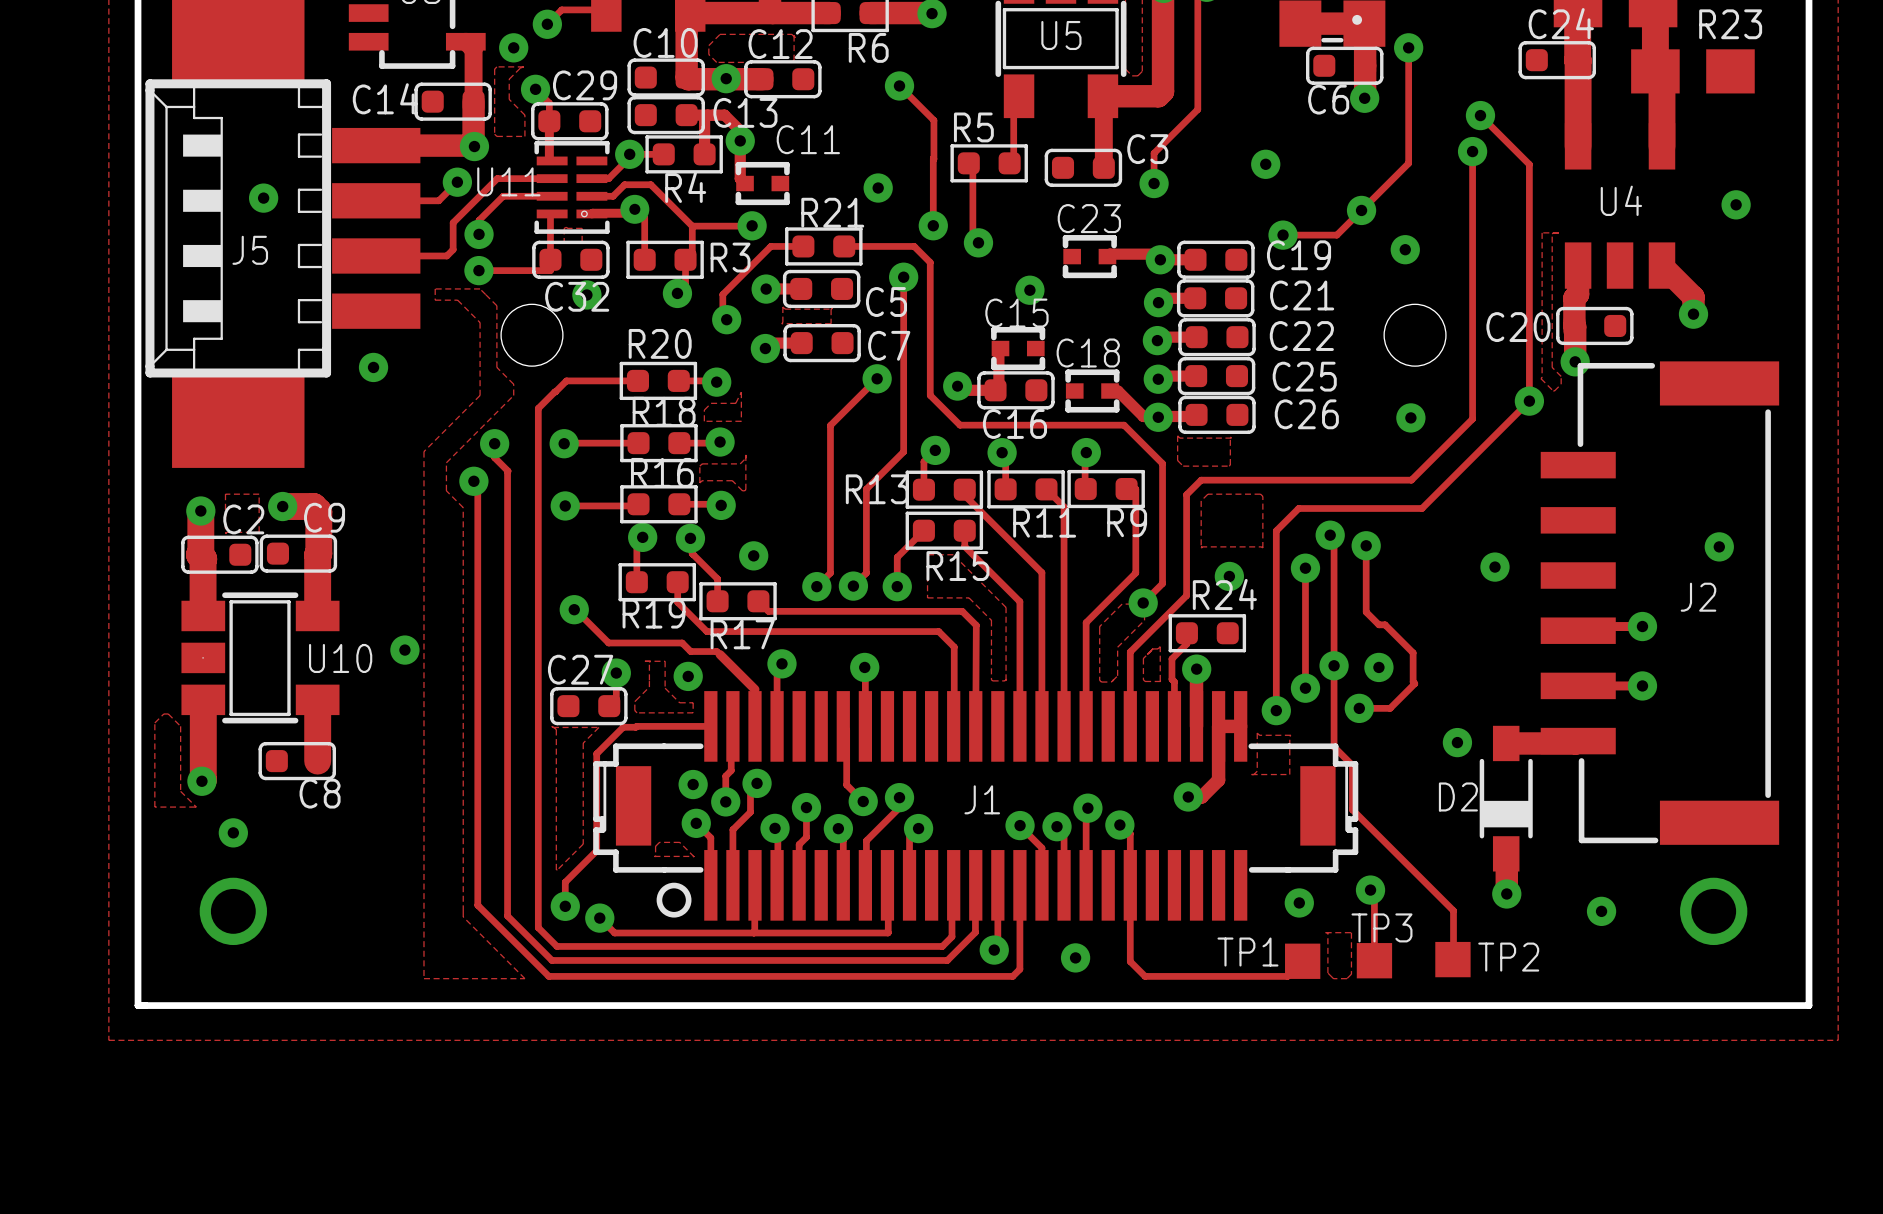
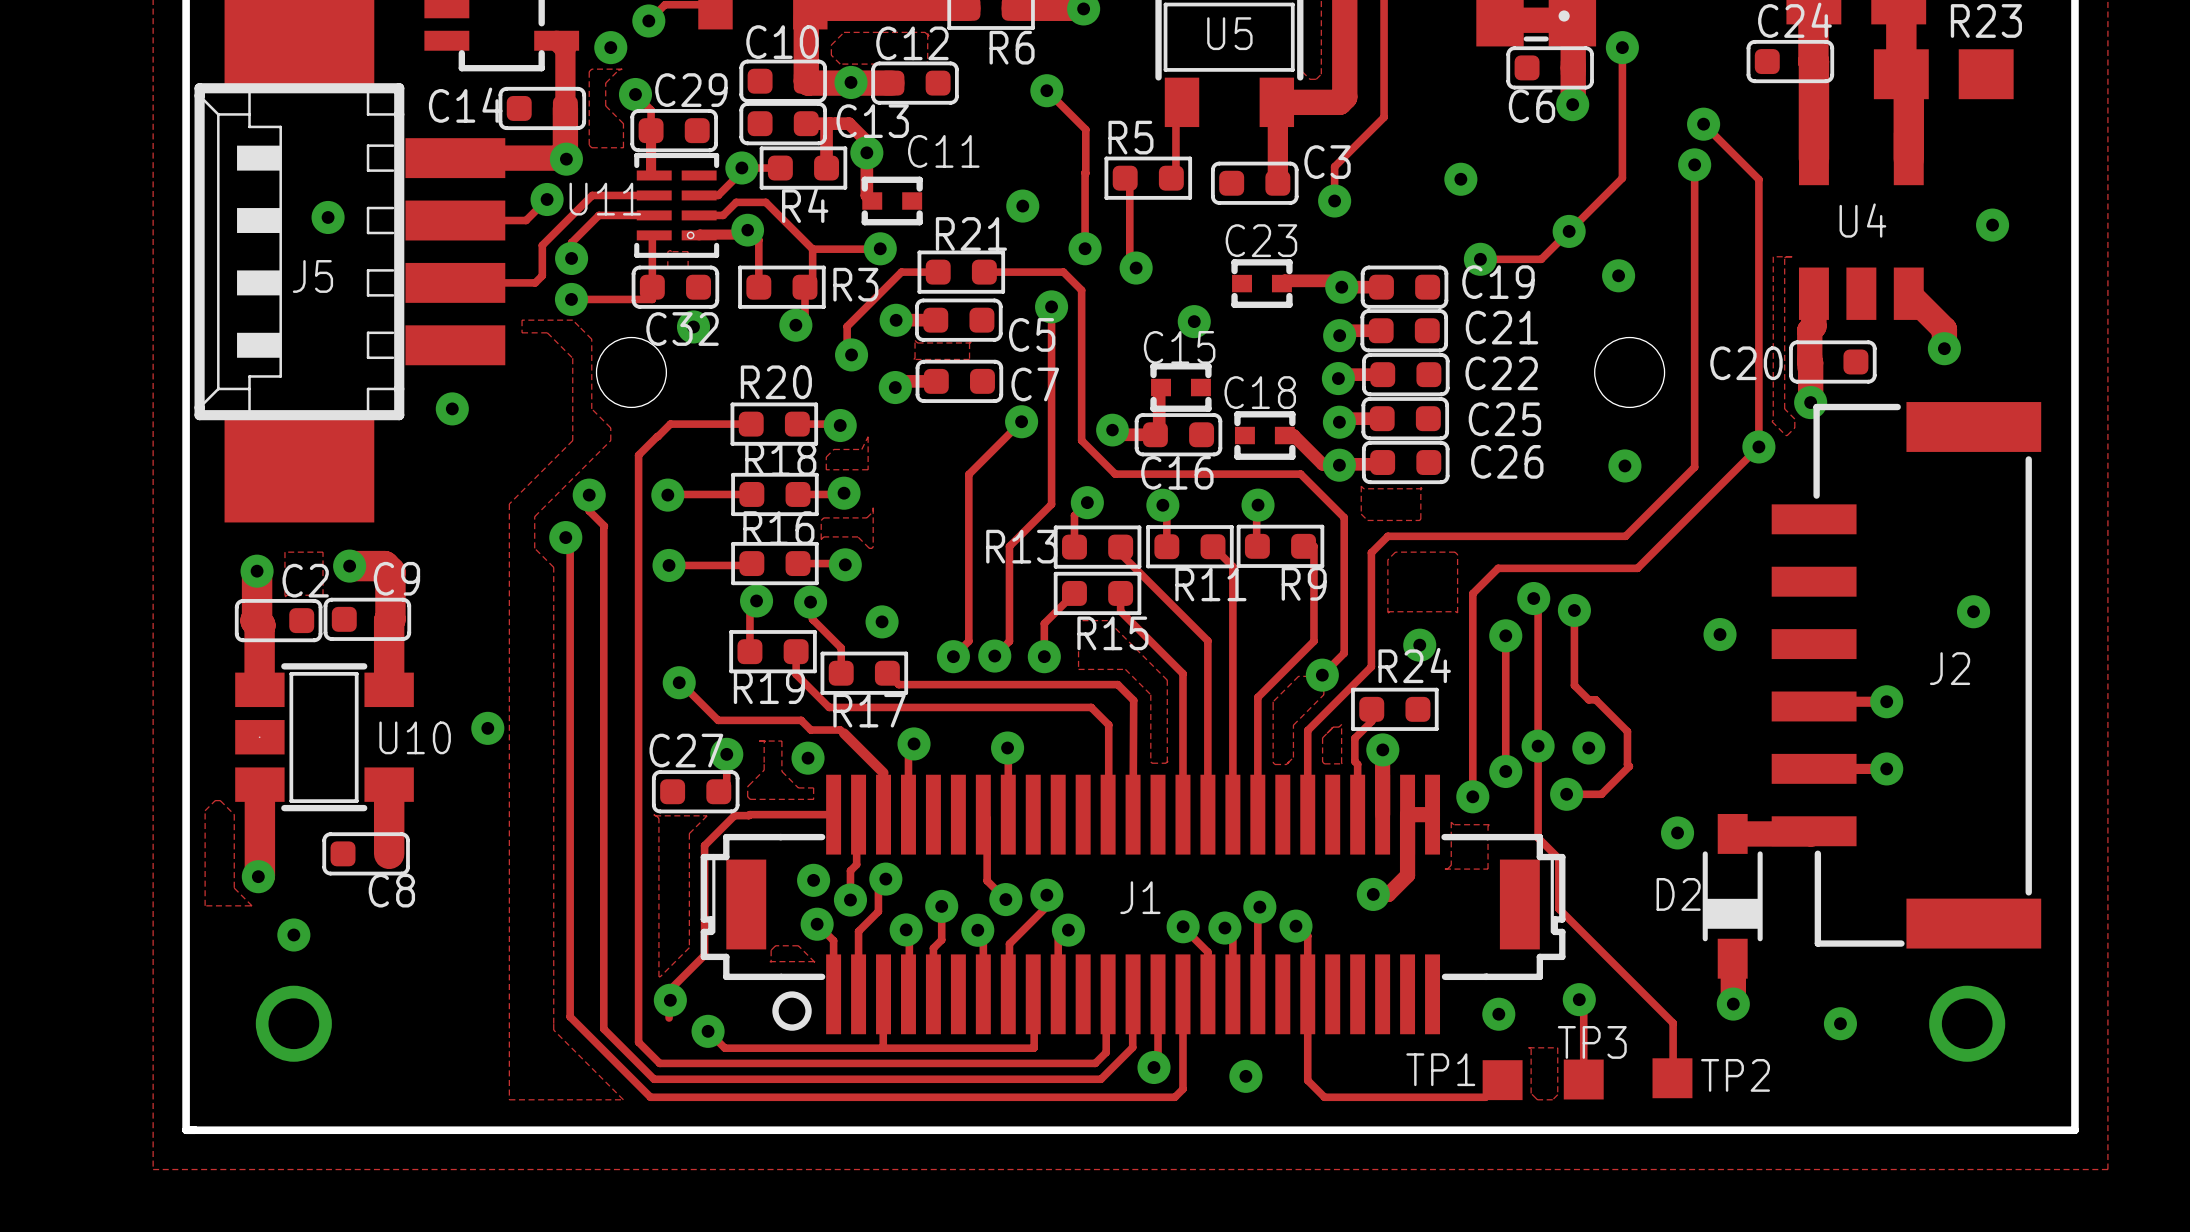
via position: (565, 906) -> (670, 1000)

